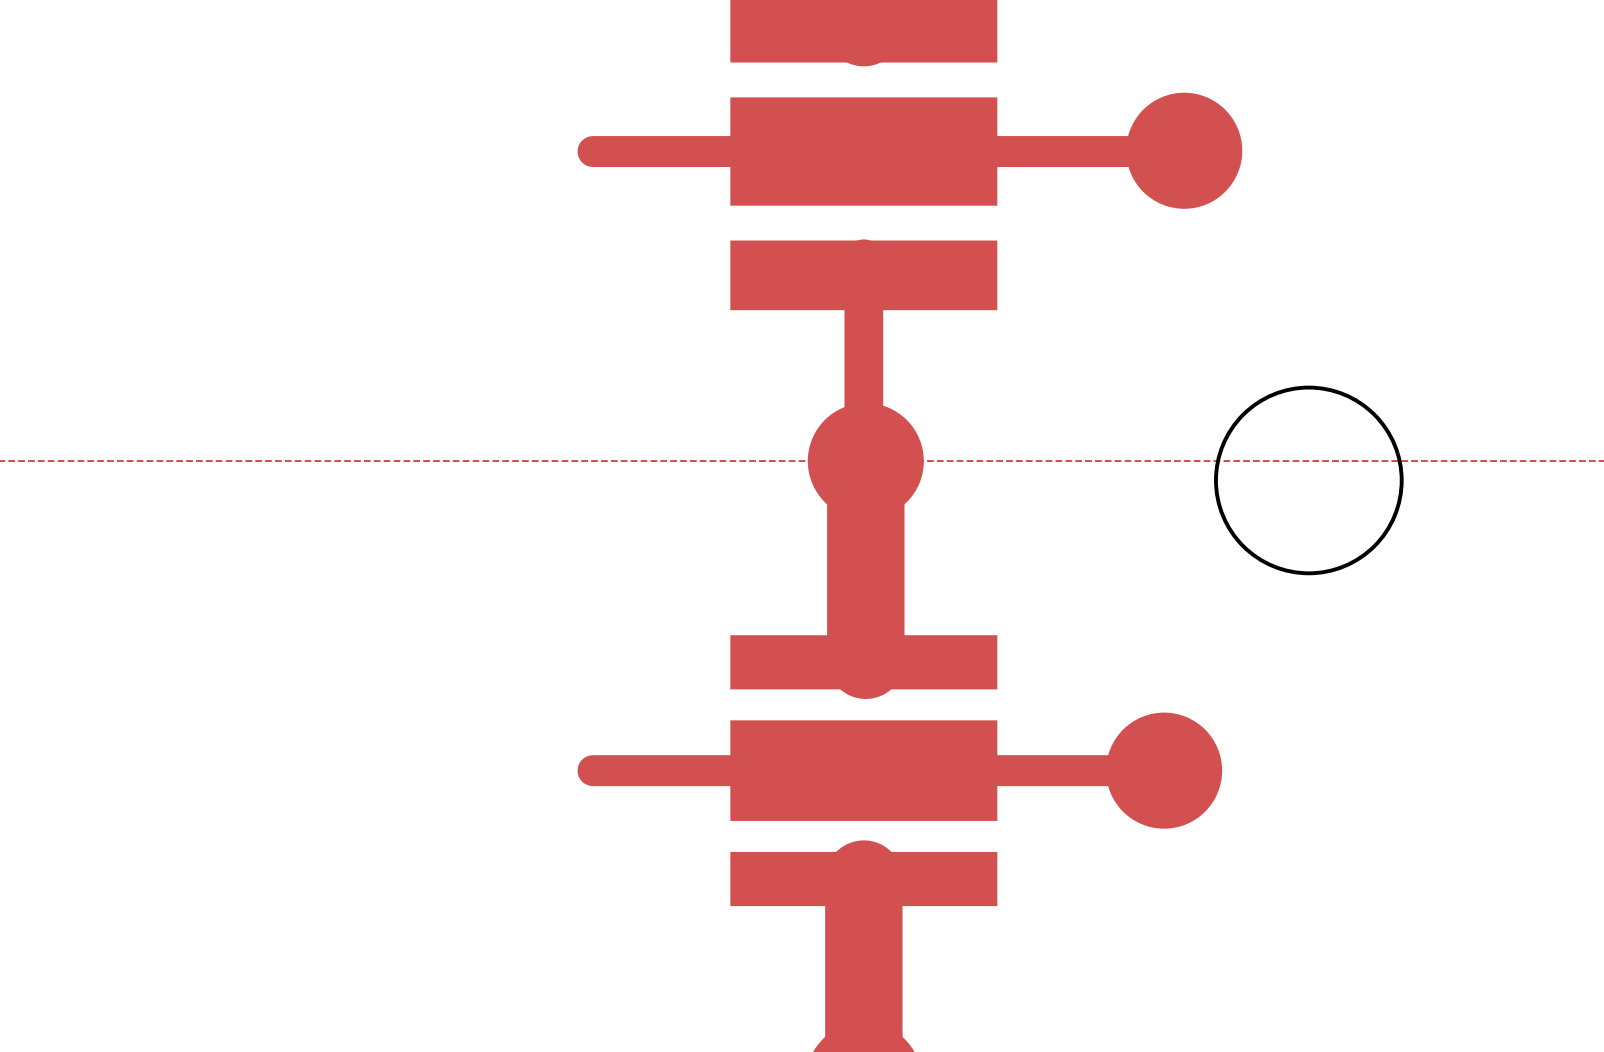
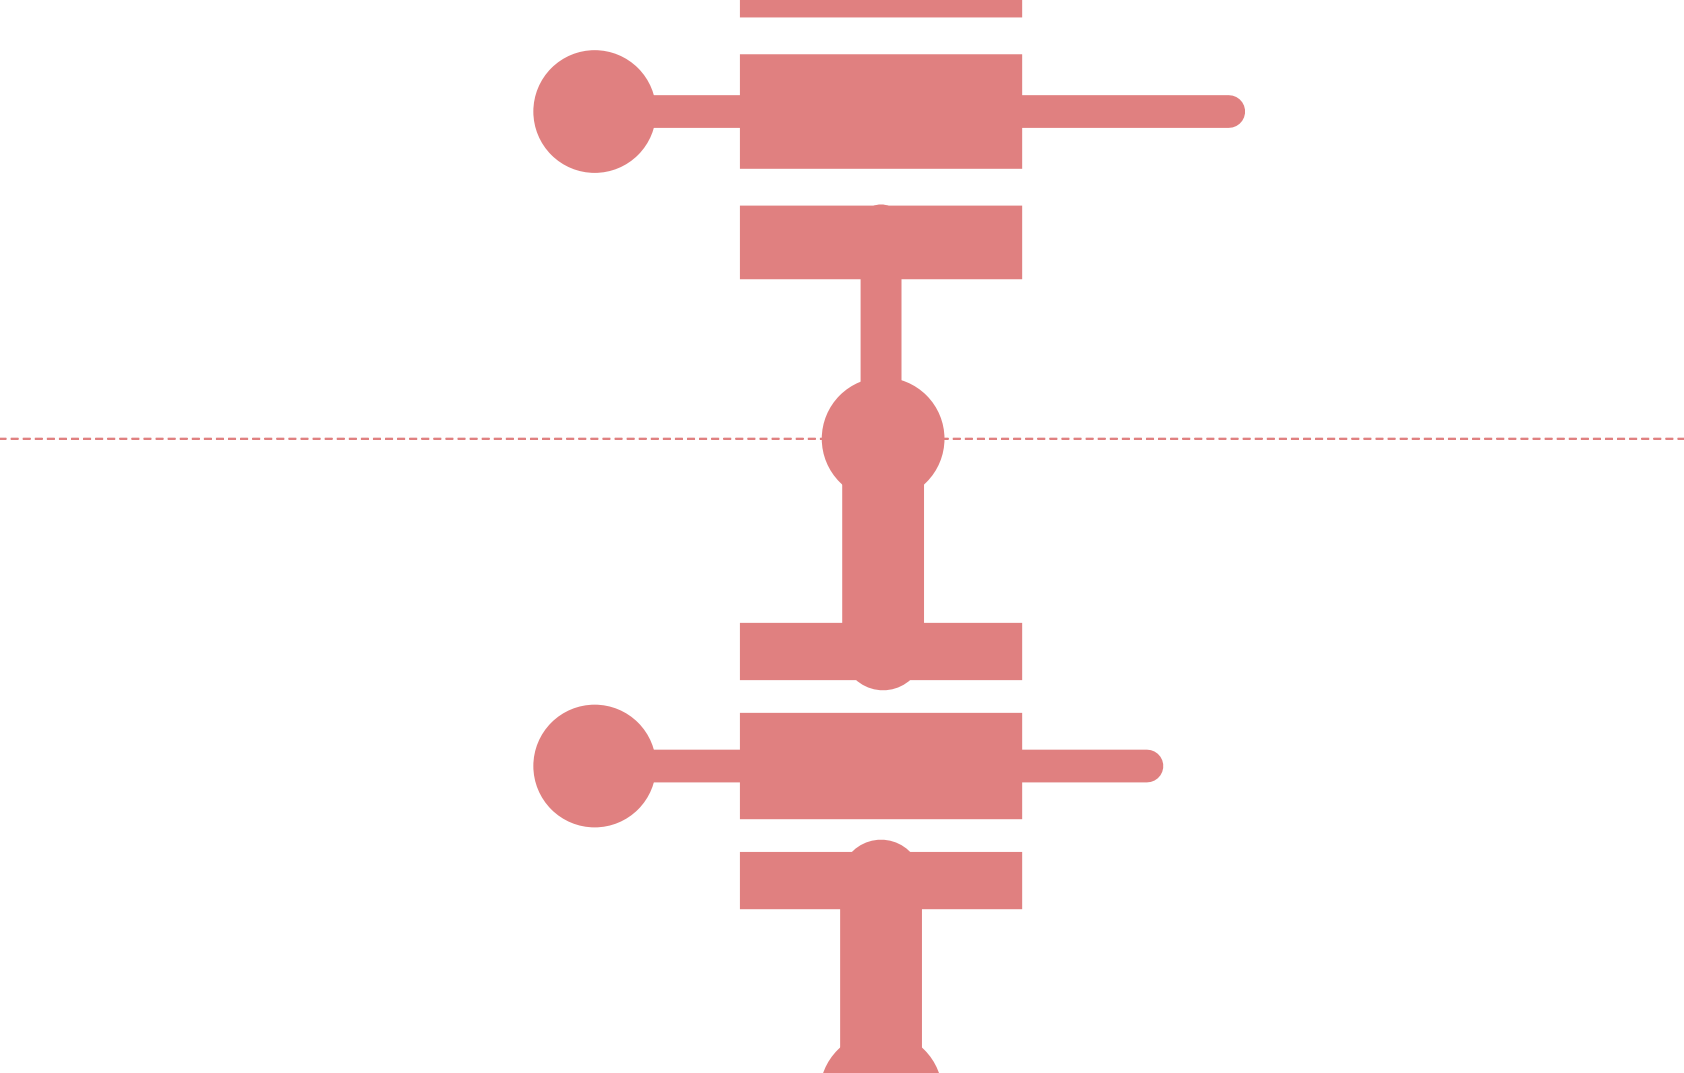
part: (1184, 150) -> none
part: none -> (594, 111)
round board edge: [1214, 385, 1404, 576] -> none
part: none -> (594, 766)
part: (1164, 770) -> none

